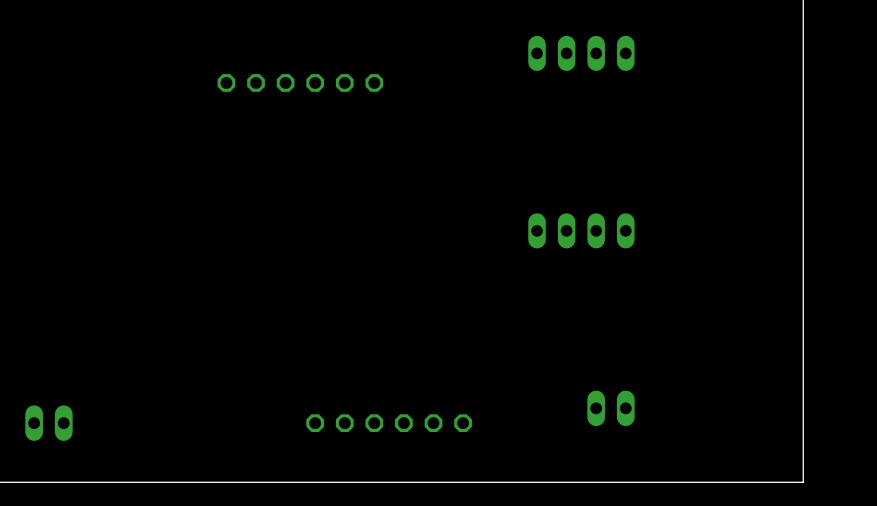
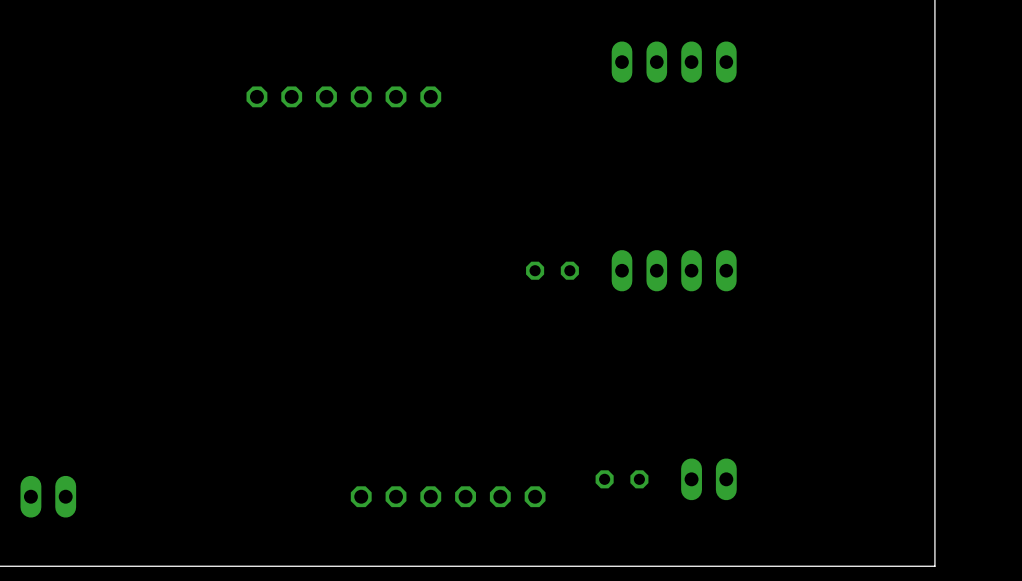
part: none -> (552, 270)
part: none -> (622, 479)

